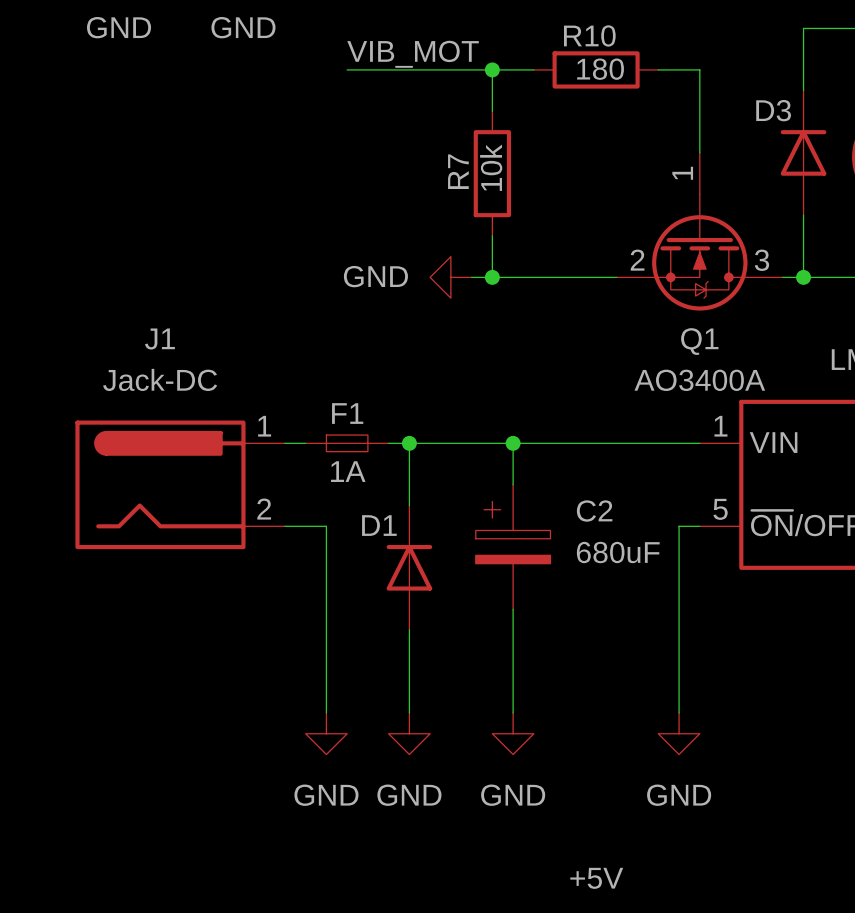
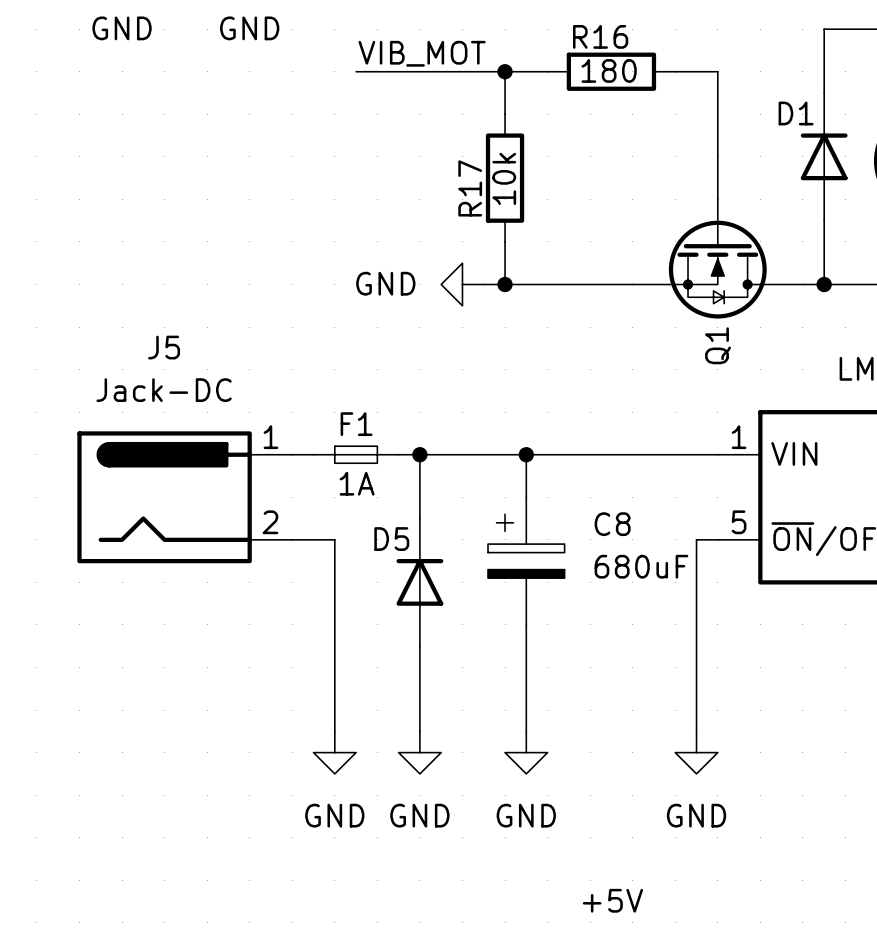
R10 name: R10 (589, 35) -> R16 (600, 36)
D3 name: D3 (773, 110) -> D1 (796, 113)
Q1 symbol: [616, 152, 783, 311] -> [632, 156, 803, 319]
R7 name: R7 (458, 171) -> R17 (470, 188)
J1 name: J1 (159, 338) -> J5 (164, 347)
Q1 value: AO3400A (699, 380) -> none
C2 name: C2 (594, 511) -> C8 (612, 524)
D1 name: D1 (379, 525) -> D5 (391, 539)

